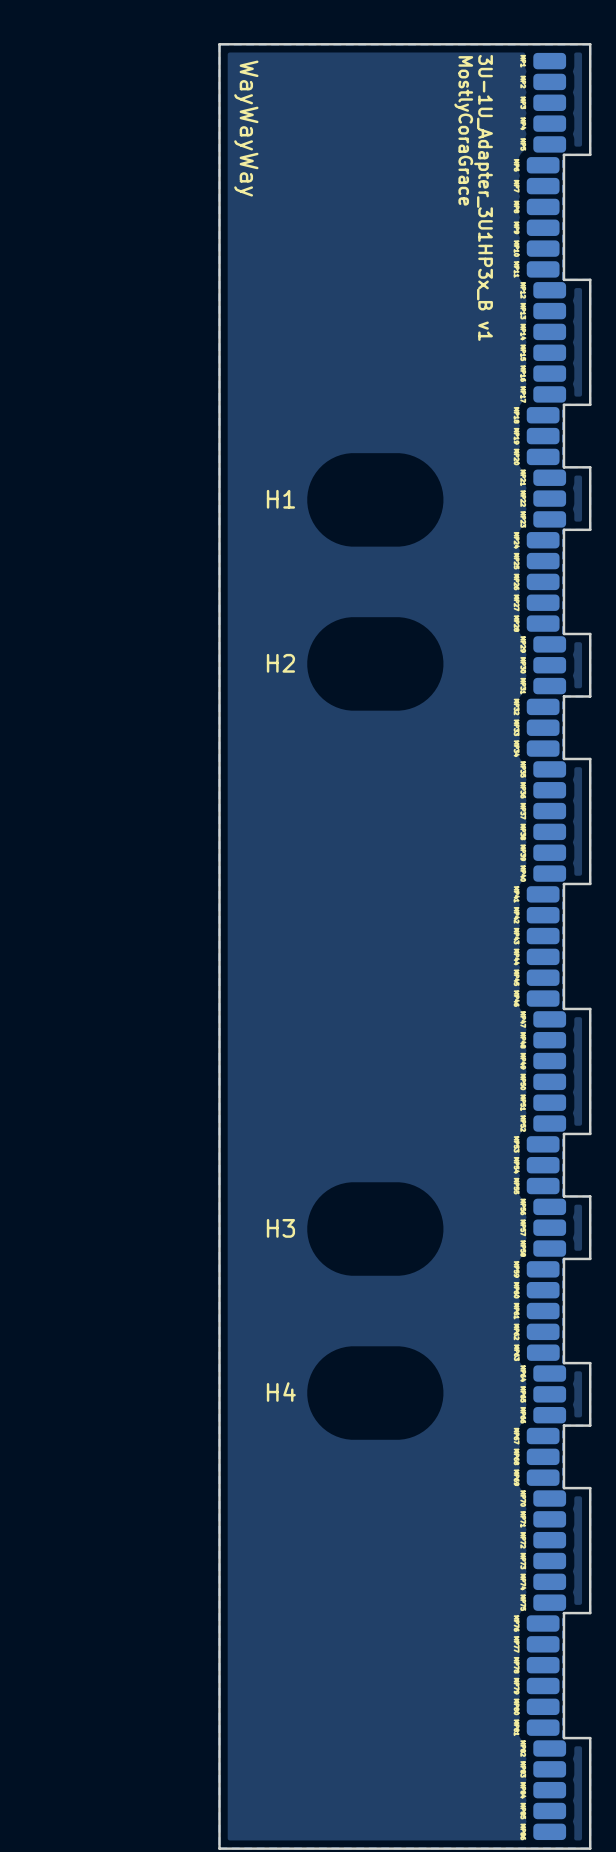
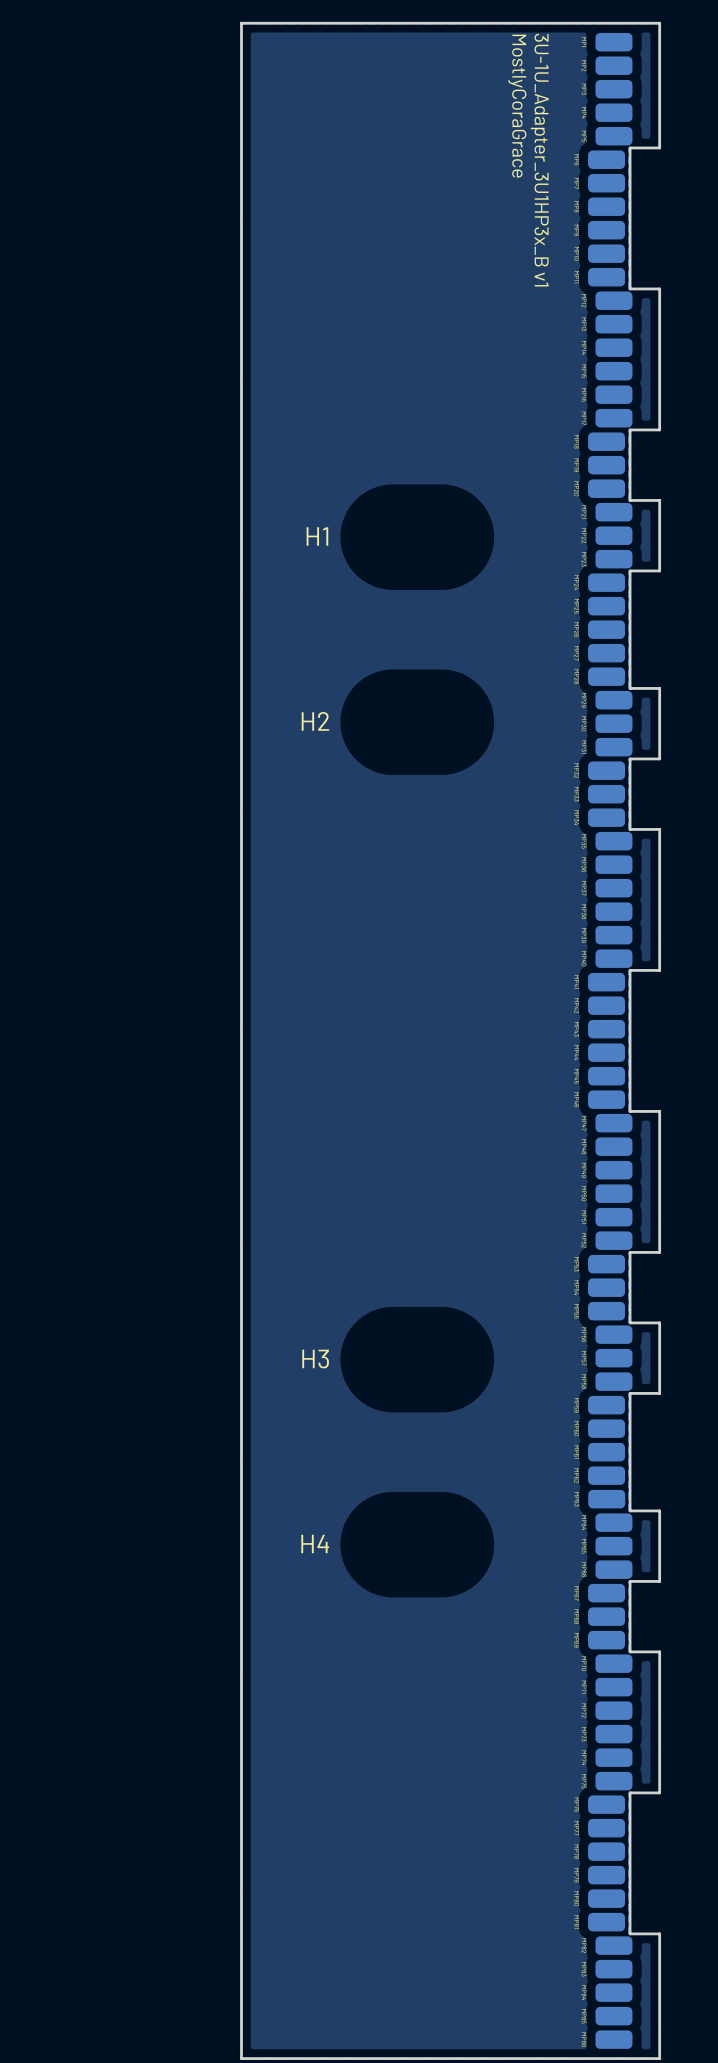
text: WayWayWay (246, 128) -> none

